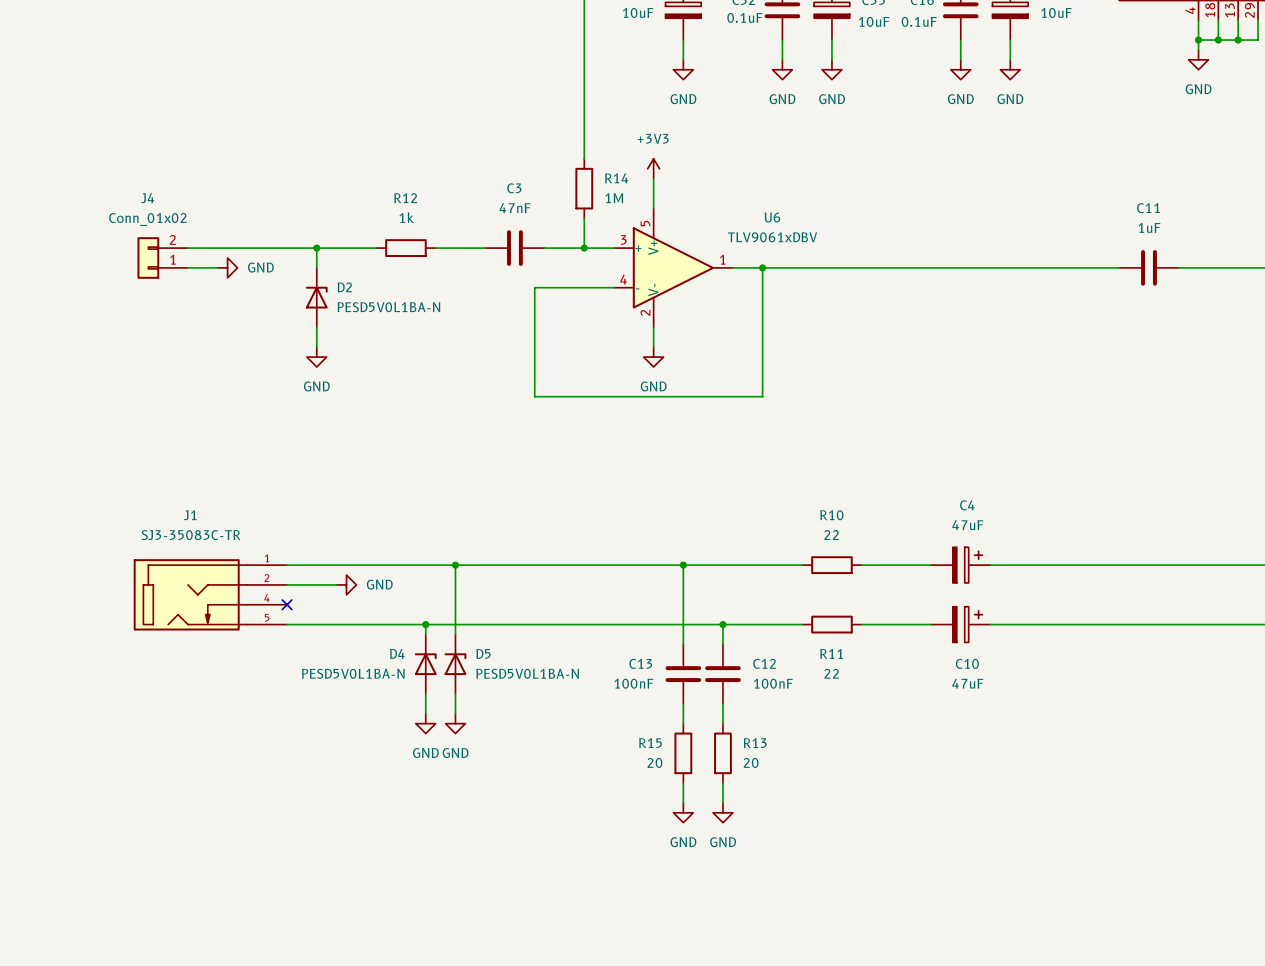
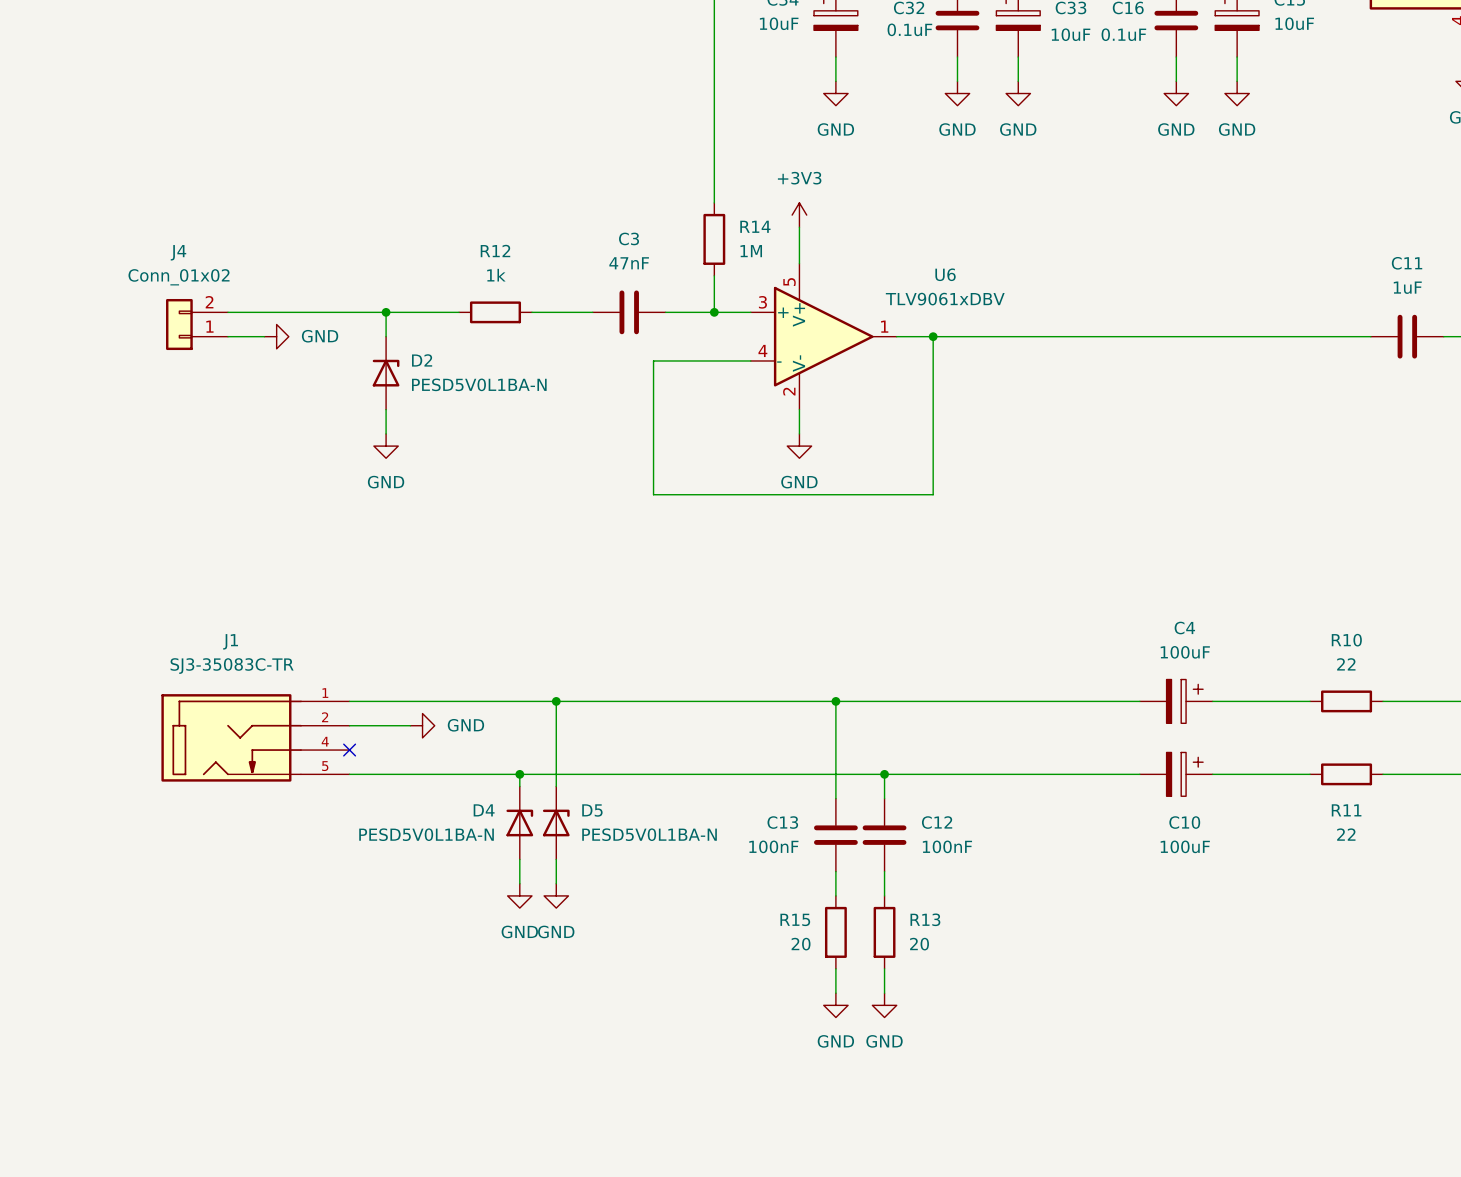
C4 value: 47uF (967, 525) -> 100uF (1185, 652)
wire: none -> (981, 701) (1054, 701)
R10 position: (831, 565) -> (1346, 701)
wire: (1069, 565) (1129, 565) -> none
wire: none -> (981, 774) (1054, 774)
R11 position: (831, 624) -> (1346, 774)
wire: (1069, 624) (1129, 624) -> none
C10 value: 47uF (967, 683) -> 100uF (1185, 846)

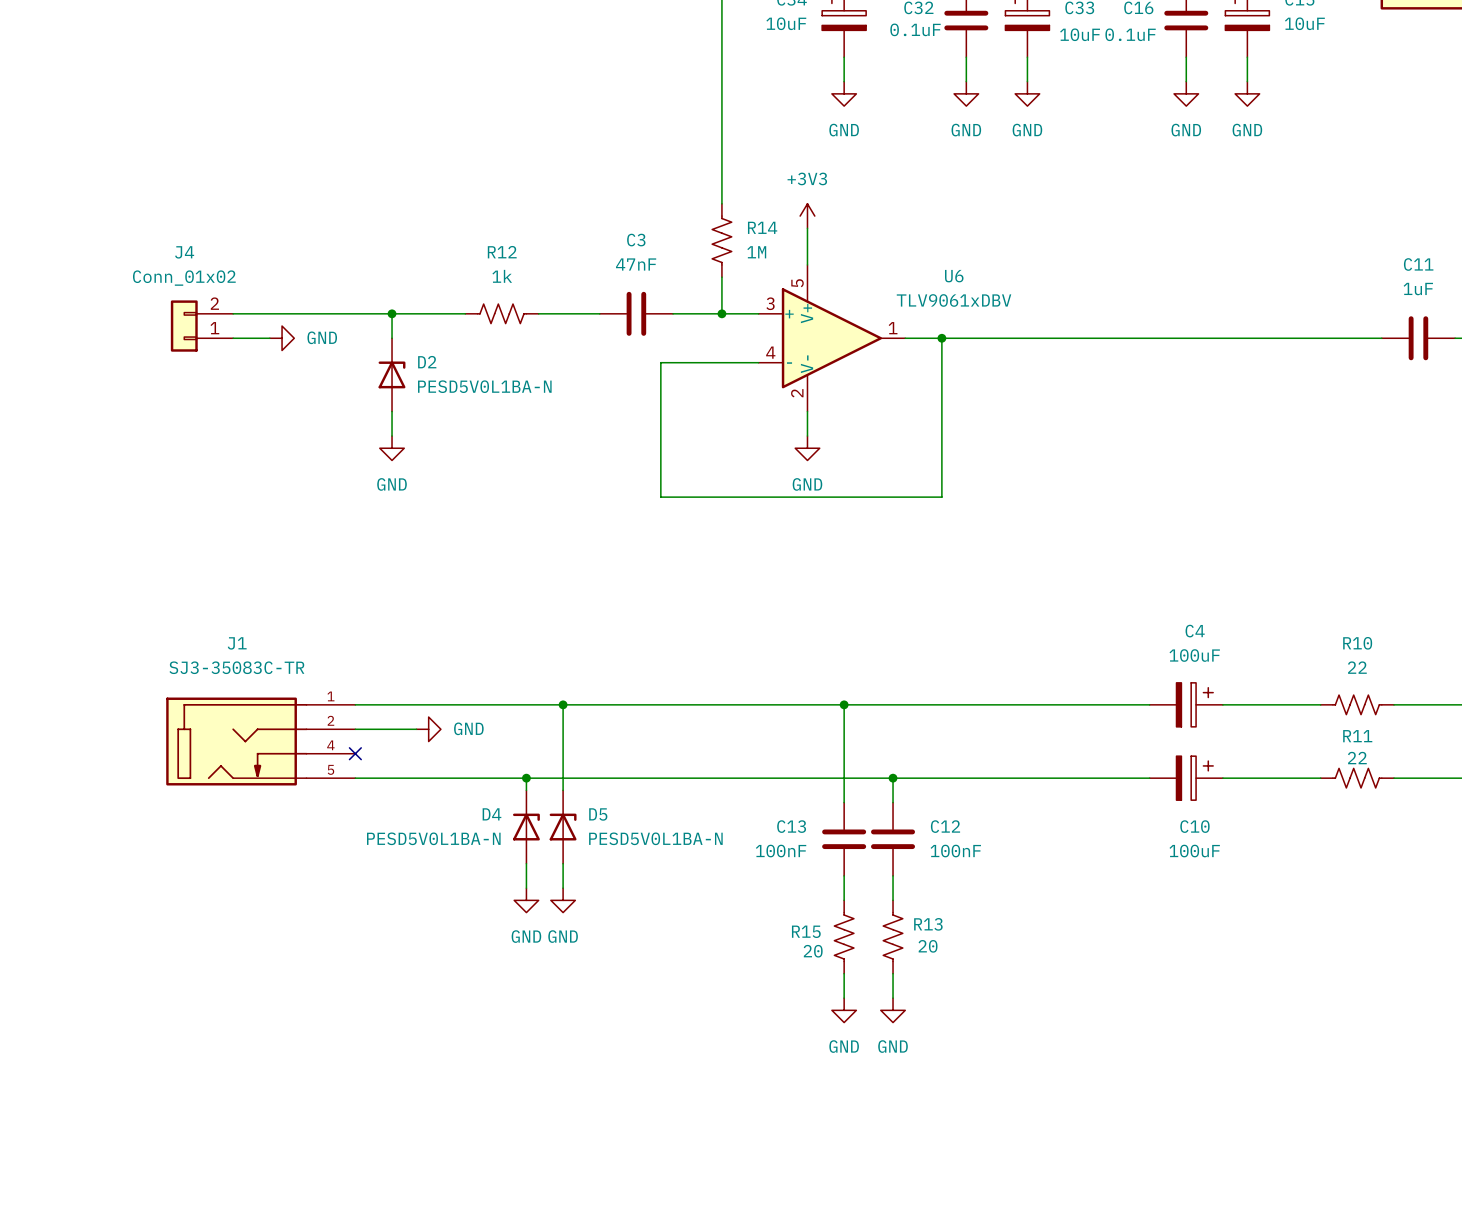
R14 symbol: [703, 202, 726, 276] -> [712, 203, 732, 278]
R12 symbol: [459, 301, 532, 324] -> [465, 304, 539, 324]
R10 symbol: [1310, 690, 1384, 713] -> [1320, 695, 1395, 715]
R11 symbol: [1310, 763, 1384, 786] -> [1320, 768, 1395, 788]
R11 name position: R11 (1346, 810) -> R11 (1357, 736)
R11 value position: 22 (1346, 834) -> 22 (1357, 758)
R15 symbol: [824, 895, 847, 969] -> [834, 900, 854, 974]
R13 symbol: [873, 895, 896, 969] -> [883, 900, 903, 974]

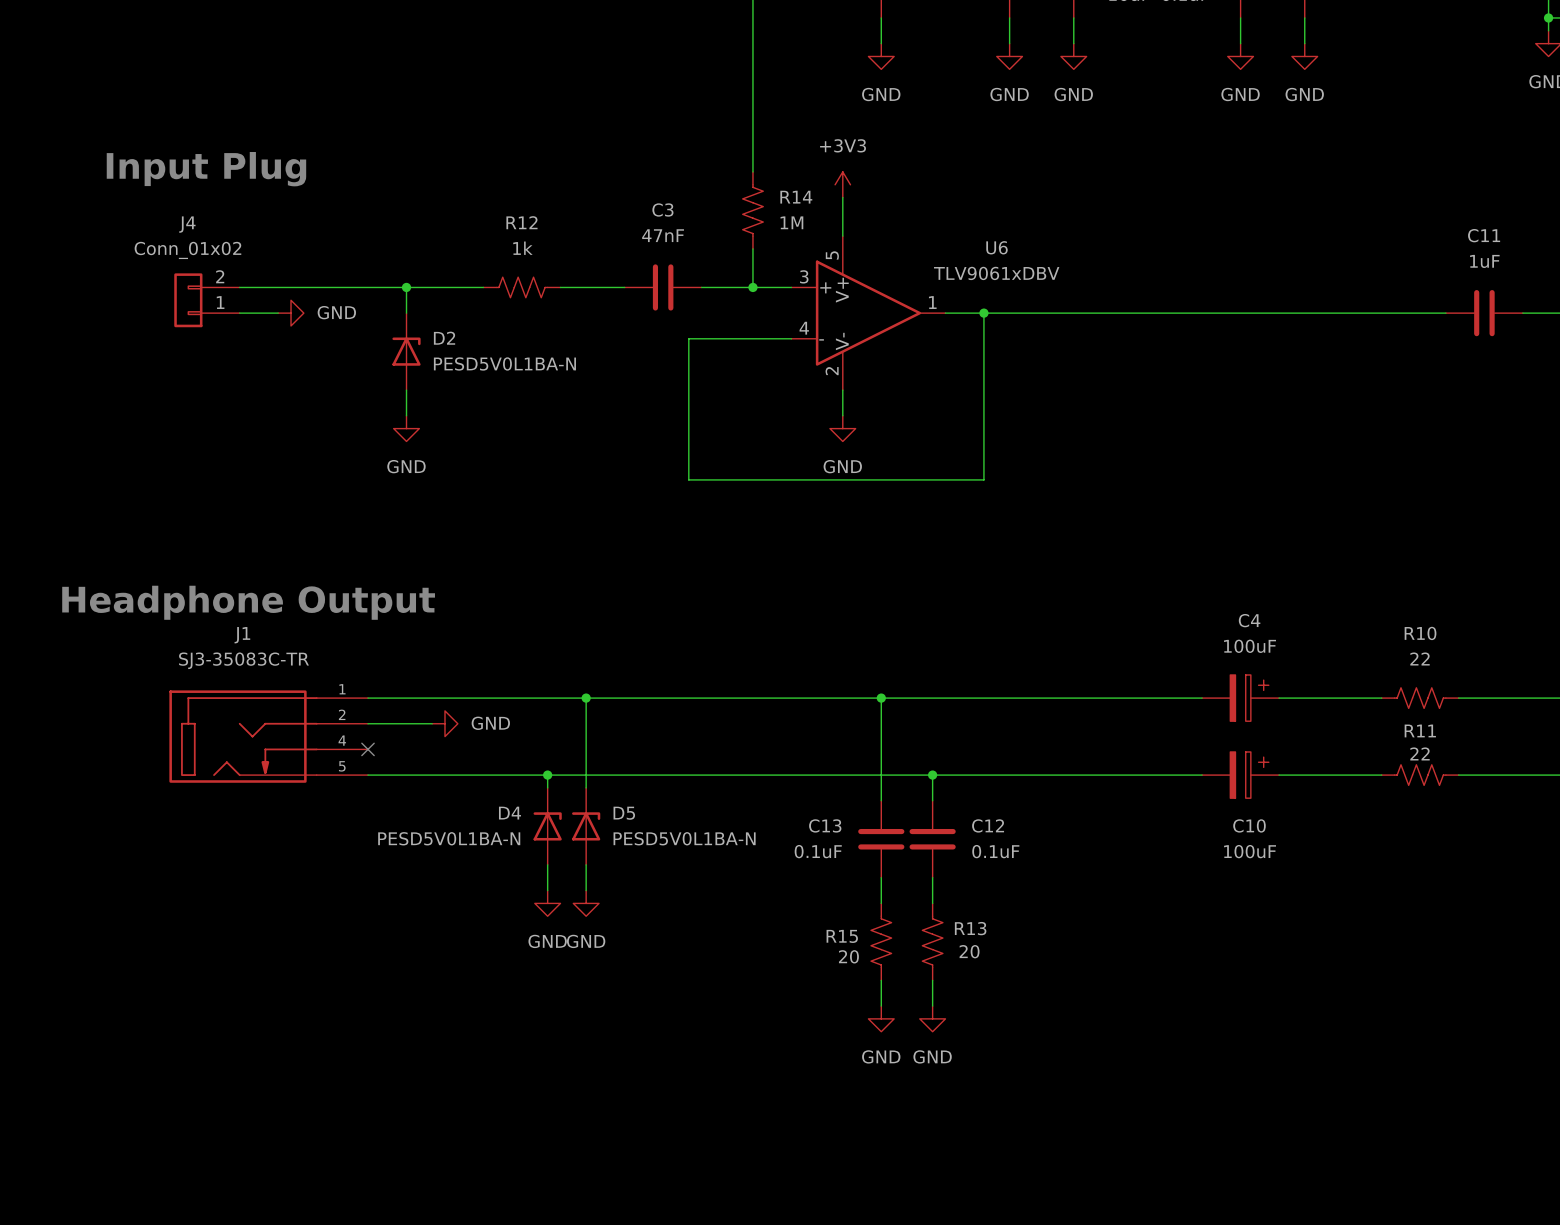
text: none -> Input Plug (206, 169)
text: none -> Headphone Output (248, 602)
C13 value: 100nF (781, 851) -> 0.1uF (818, 851)
C12 value: 100nF (955, 851) -> 0.1uF (995, 851)

